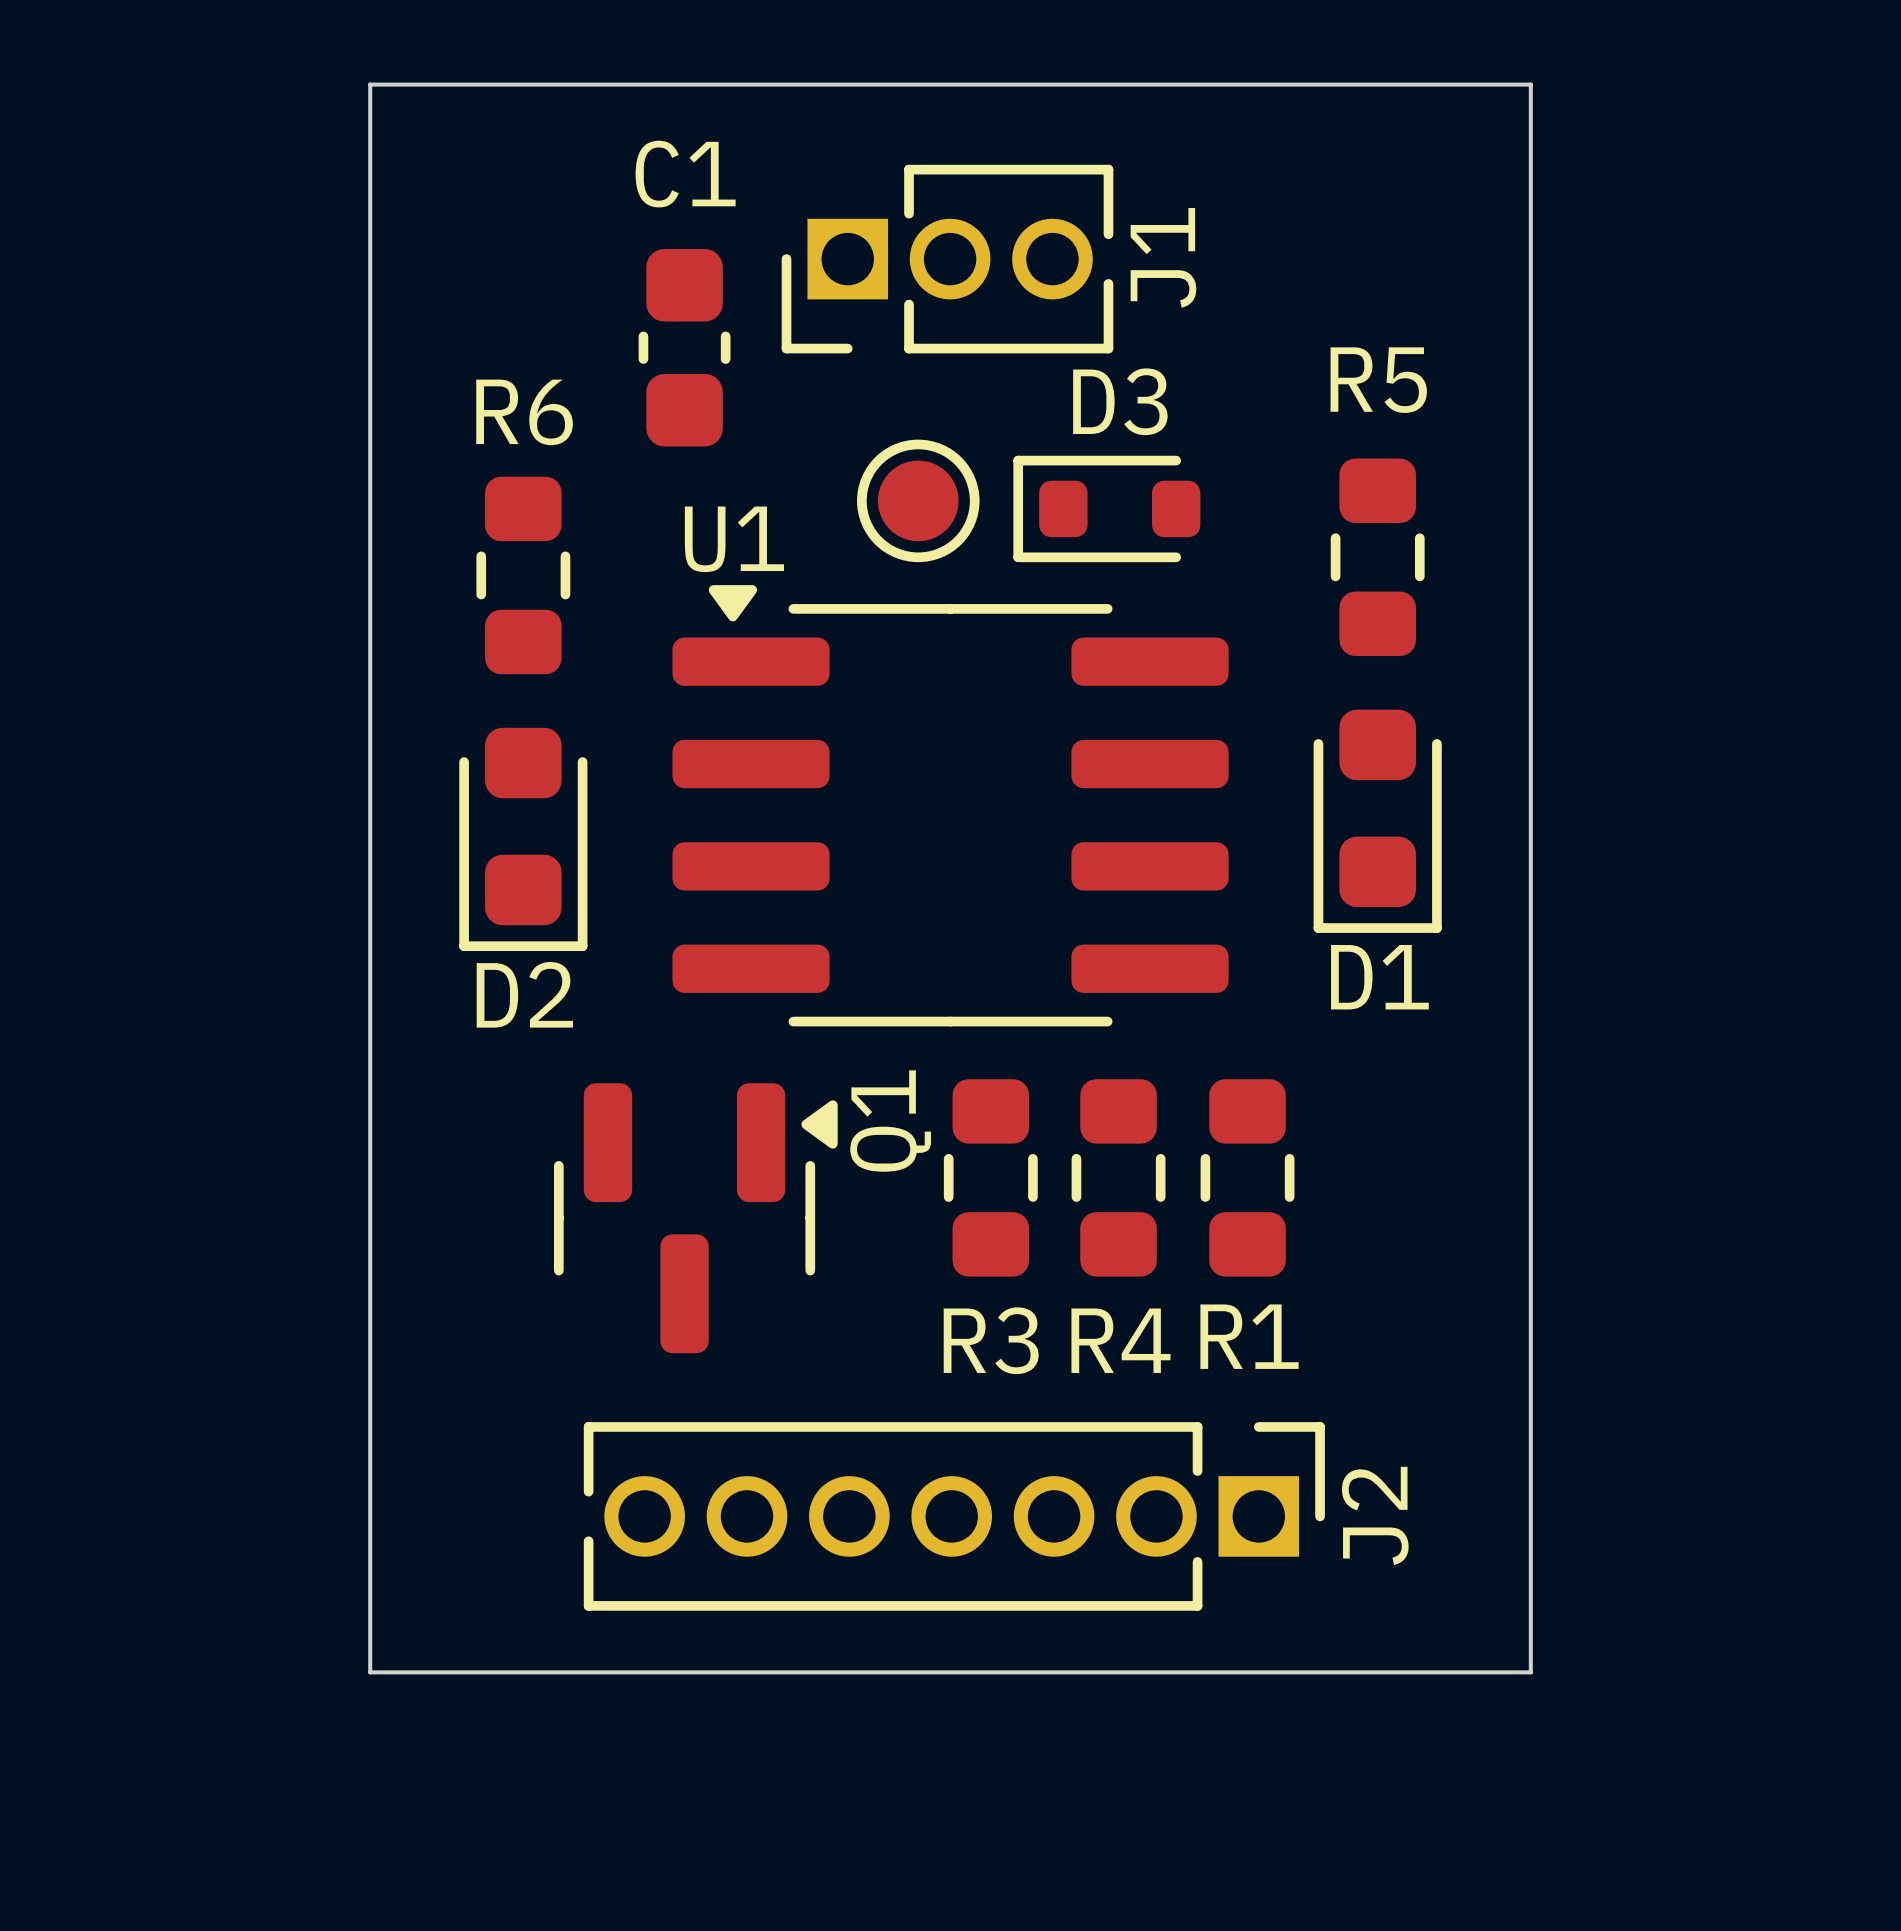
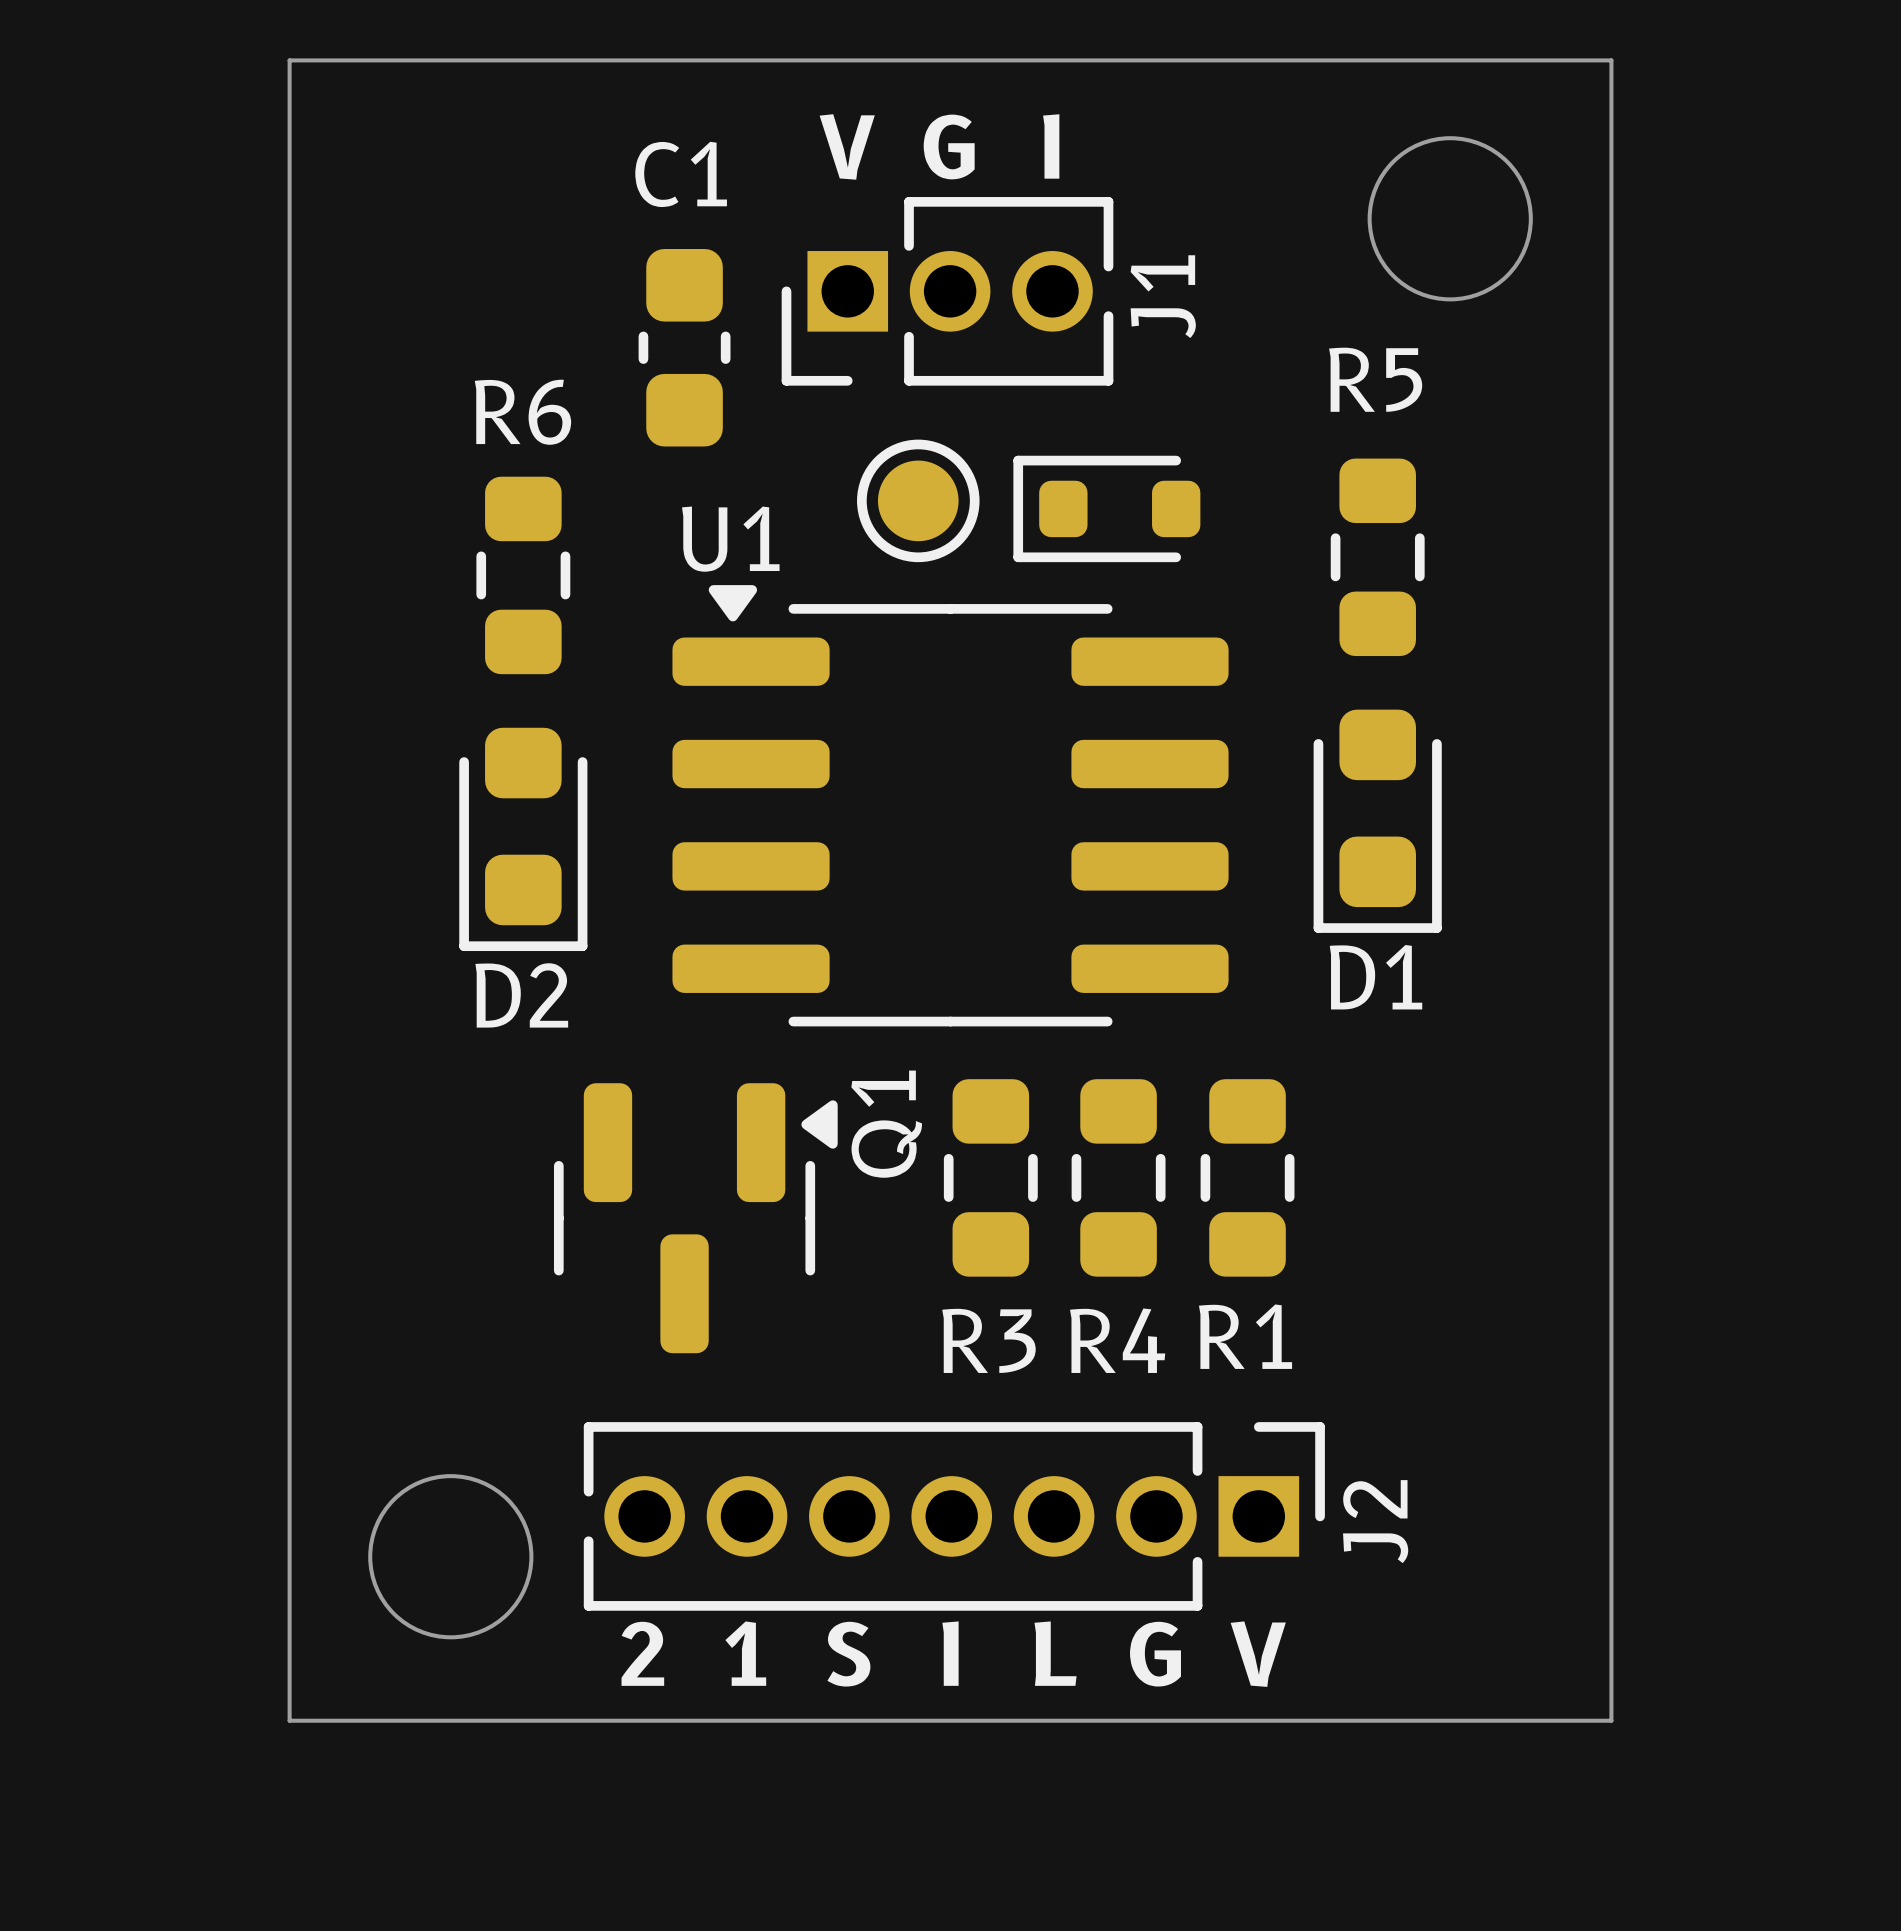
board edge: (370, 84) (1530, 84) (1530, 1672) (370, 1672) (370, 84) -> (289, 60) (289, 1720) (1611, 1720) (1611, 60) (289, 60)
round board edge: none -> [1367, 136, 1533, 302]
text: none -> V (847, 146)
text: none -> G (949, 146)
text: none -> I (1051, 146)
J1 position: (947, 259) -> (947, 291)
D3 name: D3 (1120, 401) -> none
round board edge: none -> [368, 1474, 534, 1640]
text: none -> 2 (642, 1653)
text: none -> 1 (745, 1653)
text: none -> S (848, 1654)
text: none -> I (950, 1653)
text: none -> L (1055, 1653)
text: none -> G (1155, 1654)
text: none -> V (1258, 1654)

